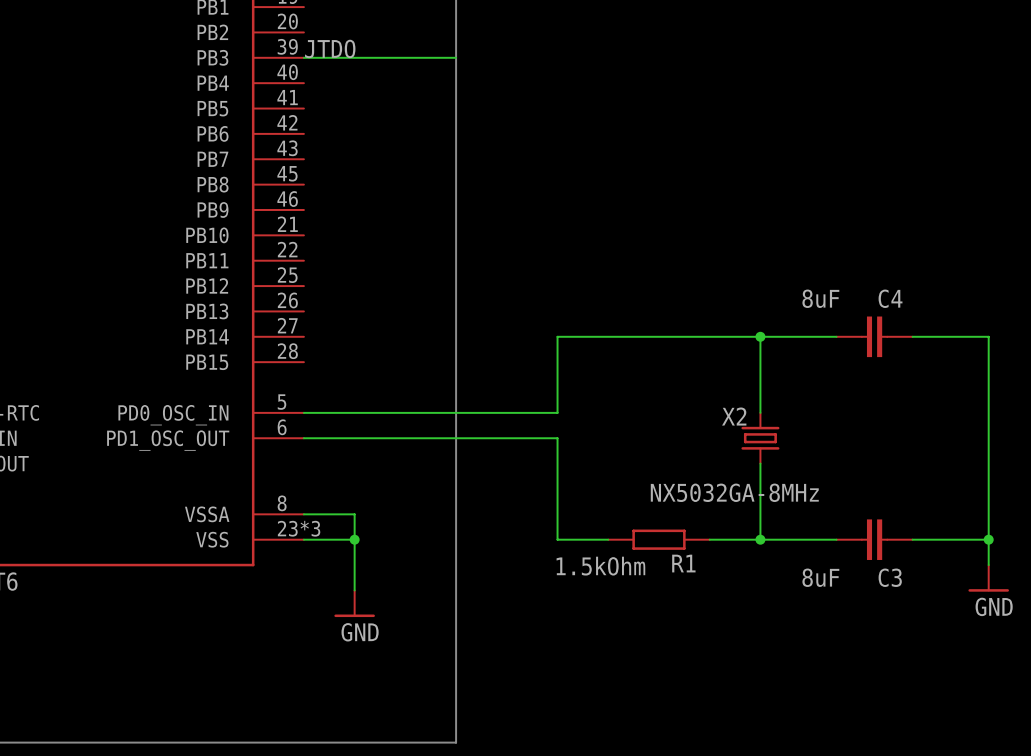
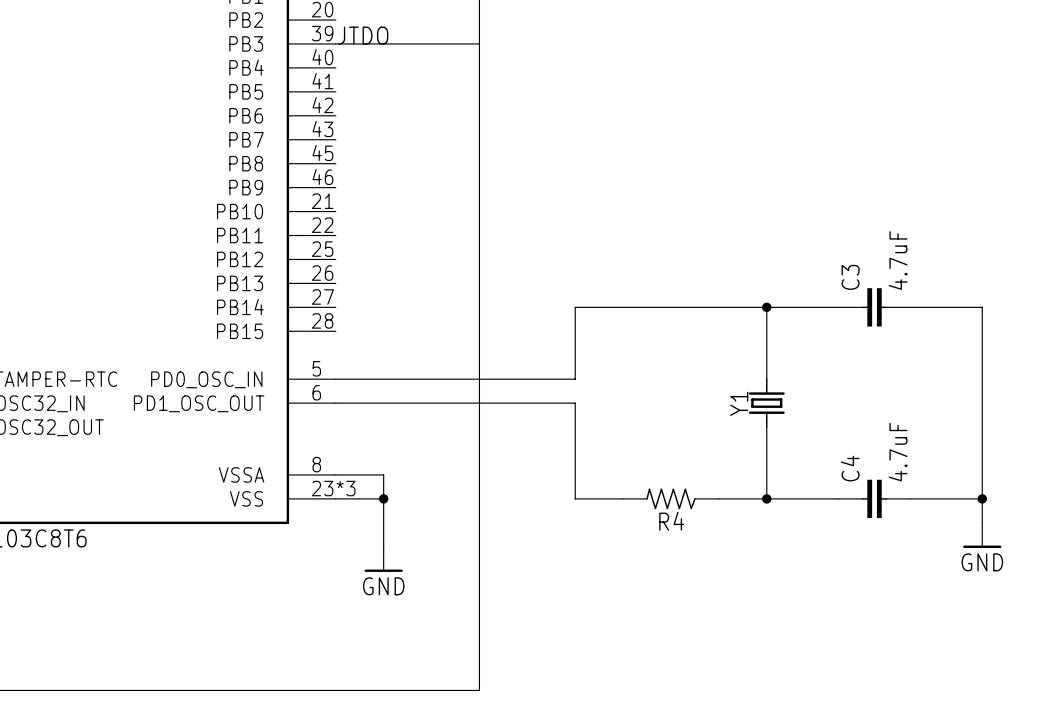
C4 value: 8uF (820, 298) -> 4.7uF (898, 260)
C4 name: C4 (890, 298) -> C3 (850, 277)
X2 name: X2 (734, 416) -> Y1 (739, 403)
X2 value: NX5032GA-8MHz (734, 492) -> none
R1: 1.5kOhm (658, 539) -> none
R4: none -> (671, 498)
C3 value: 8uF (820, 577) -> 4.7uF (898, 452)
C3 name: C3 (890, 577) -> C4 (850, 468)

